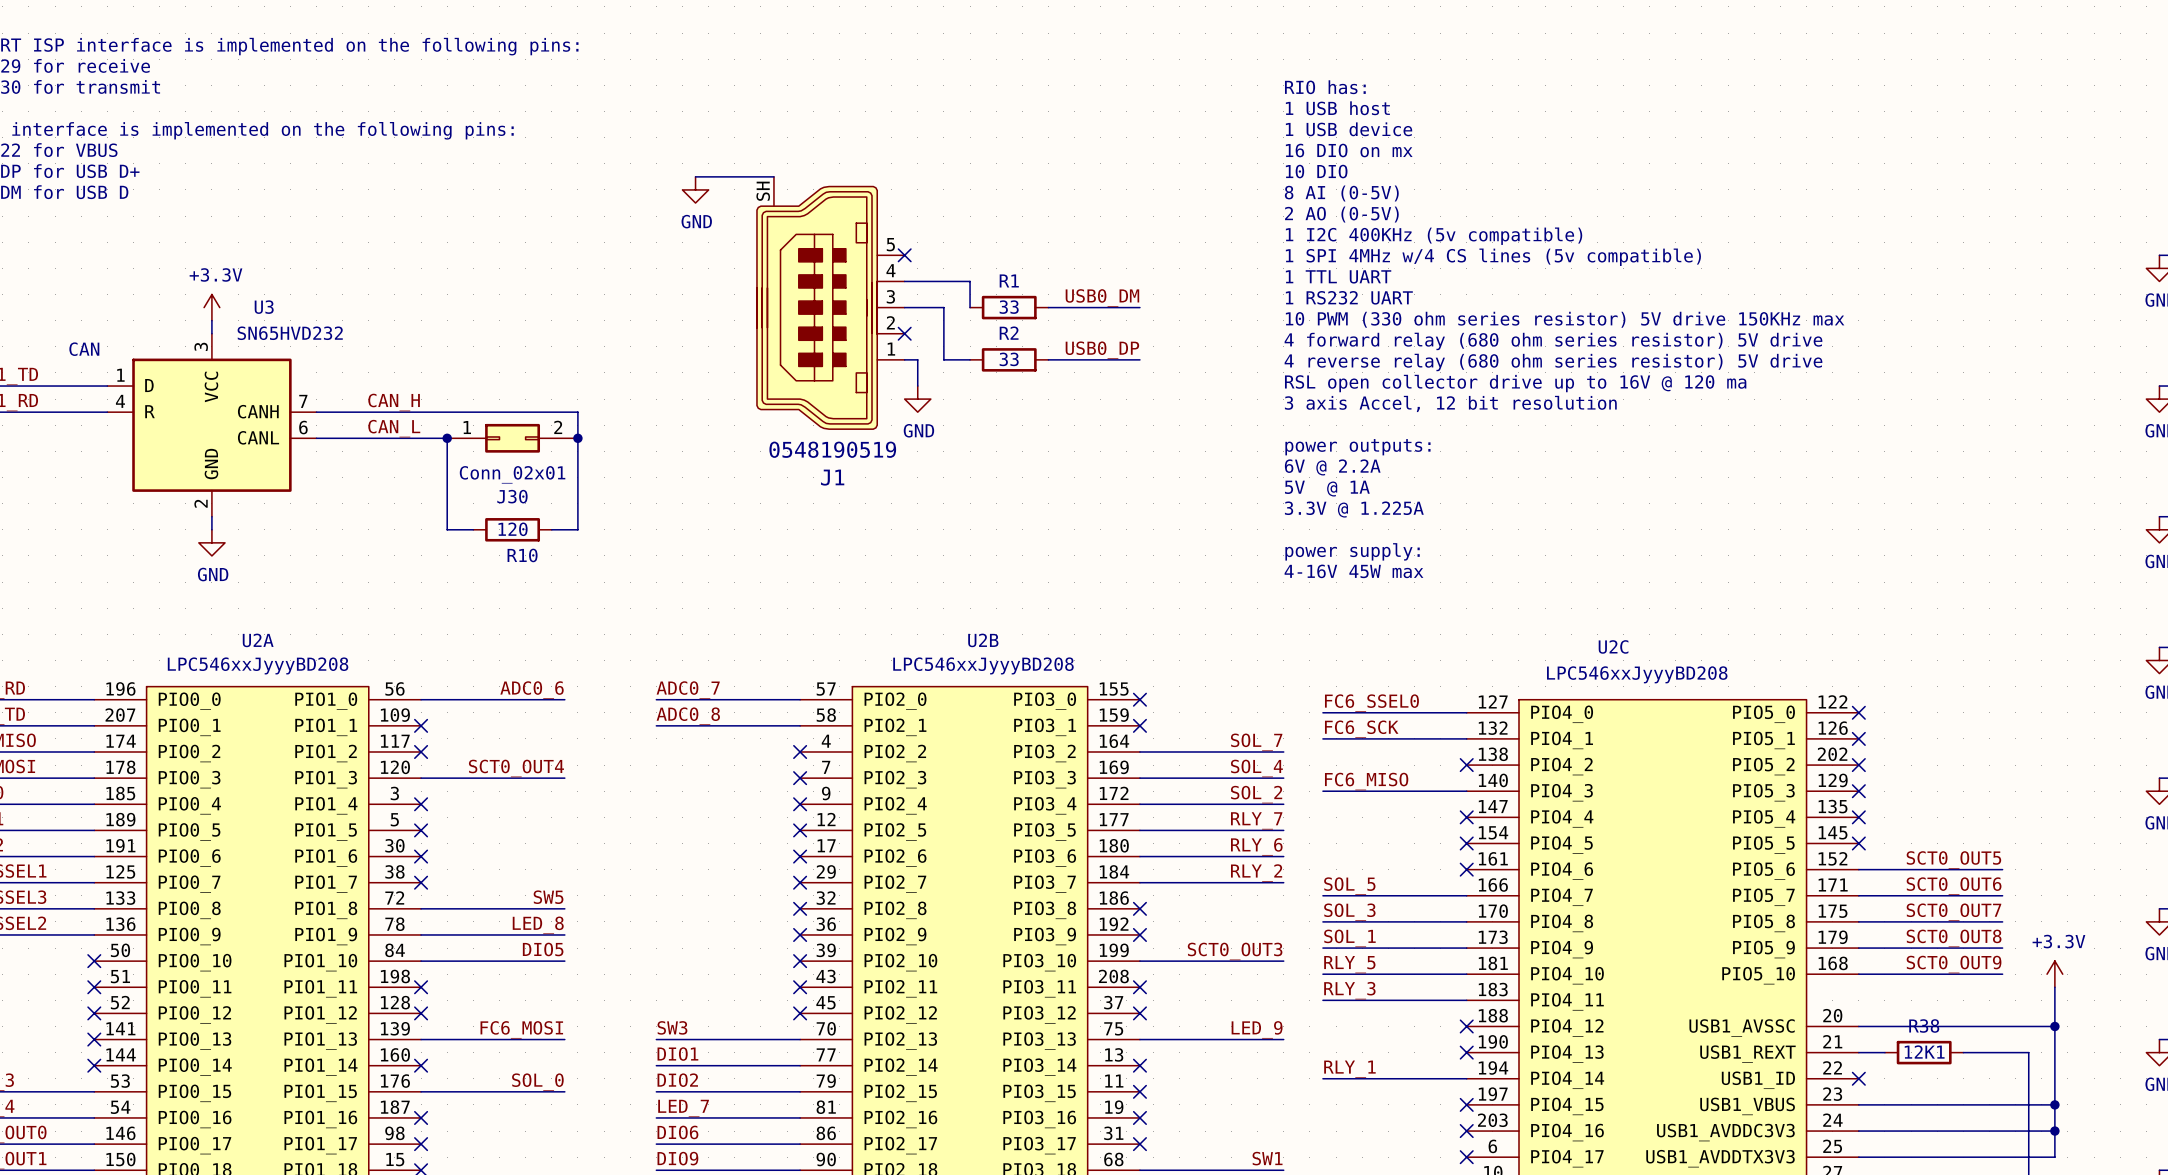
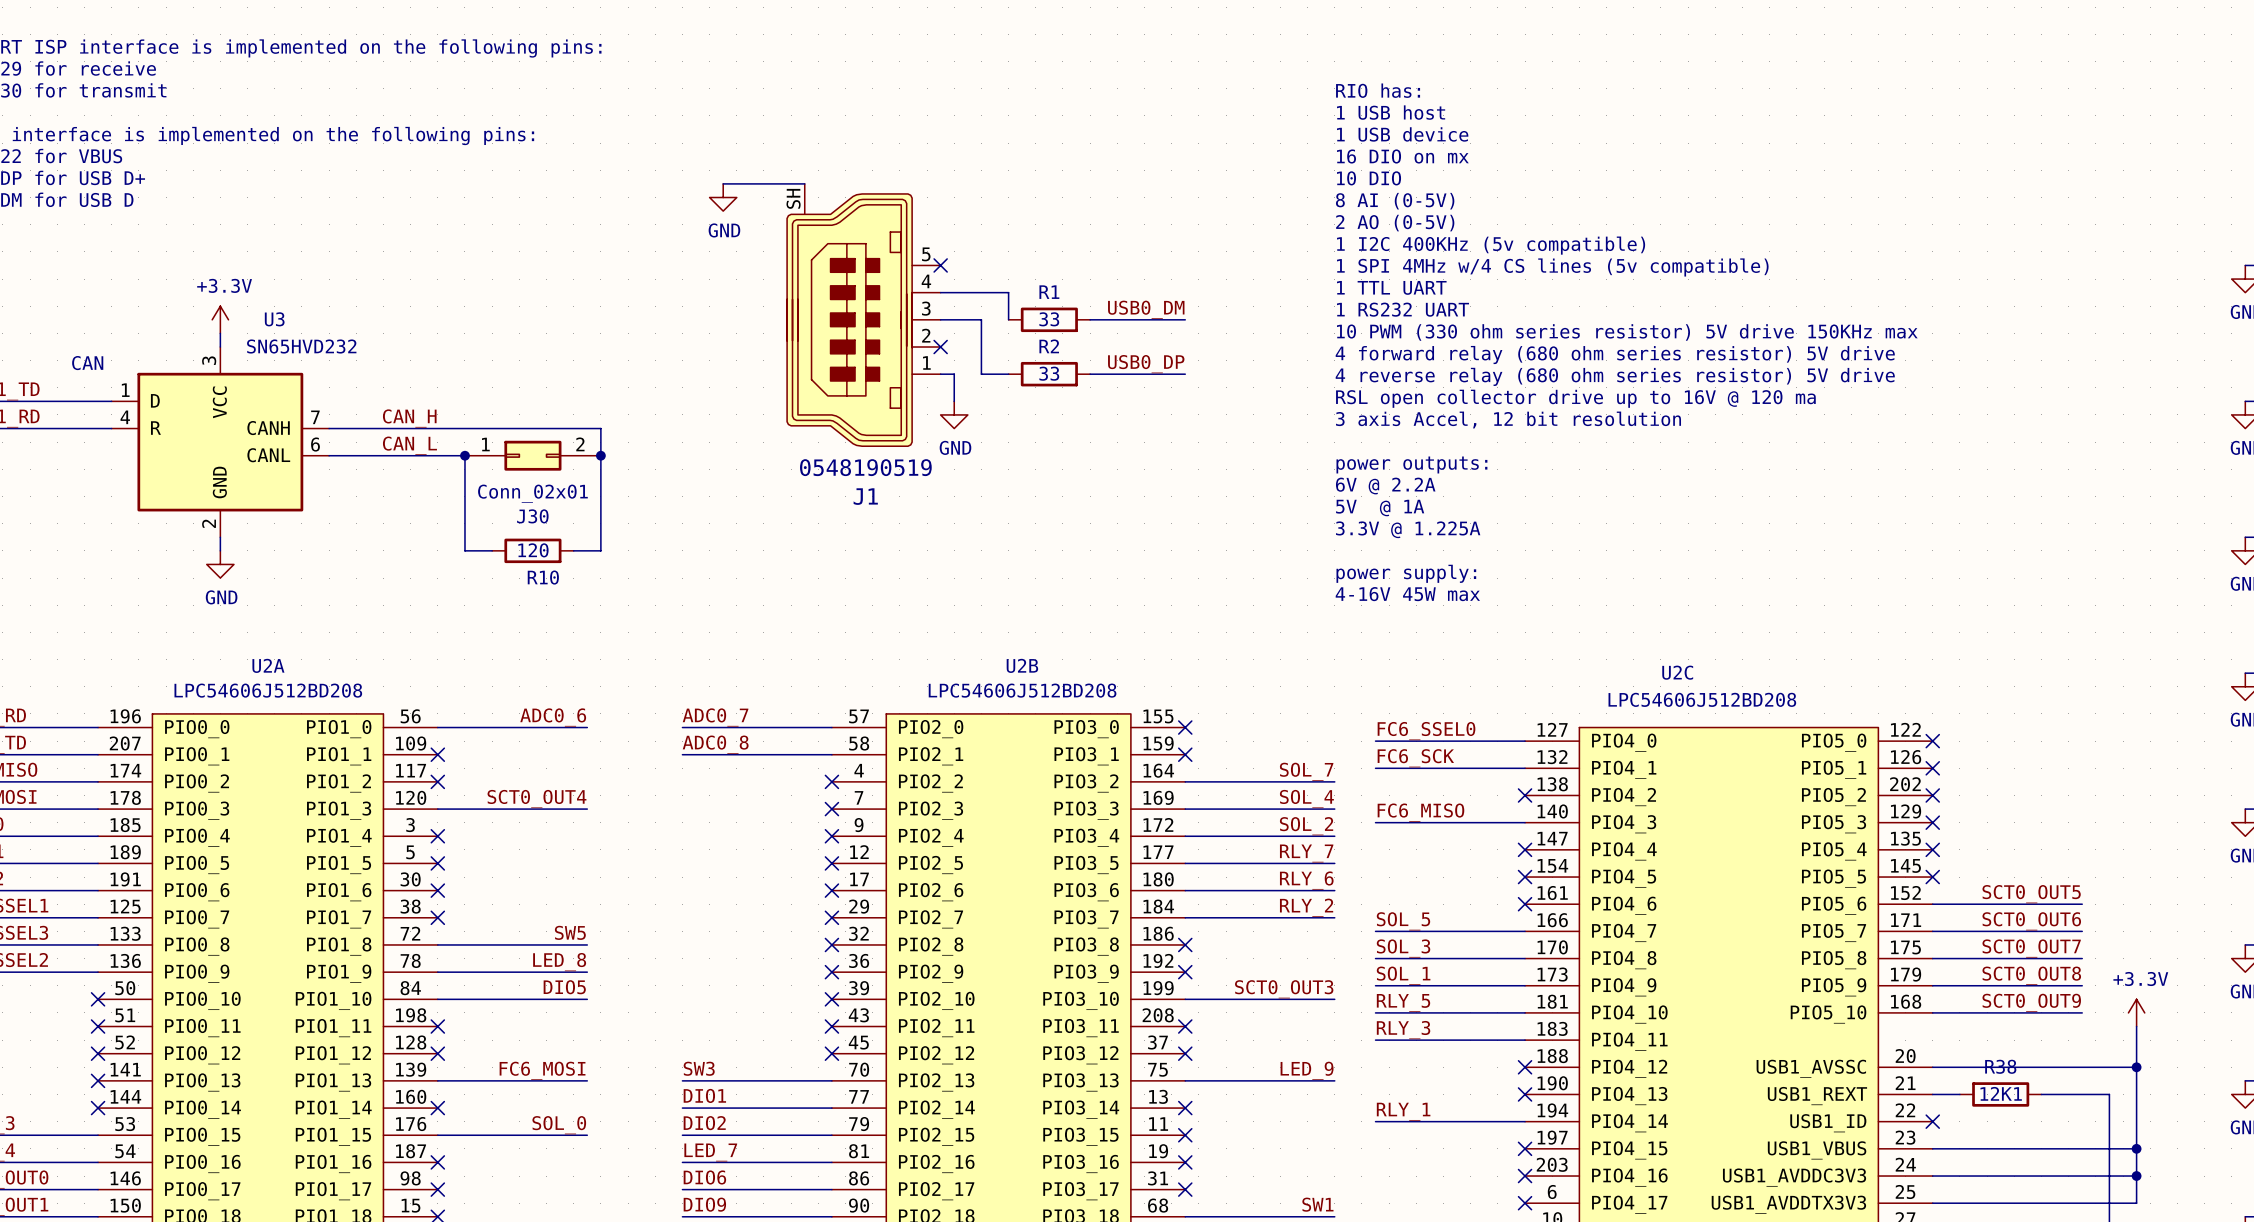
U2A value: LPC546xxJyyyBD208 (258, 665) -> LPC54606J512BD208 (268, 690)
U2B value: LPC546xxJyyyBD208 (983, 665) -> LPC54606J512BD208 (1022, 690)
U2C value: LPC546xxJyyyBD208 (1637, 674) -> LPC54606J512BD208 (1702, 699)

